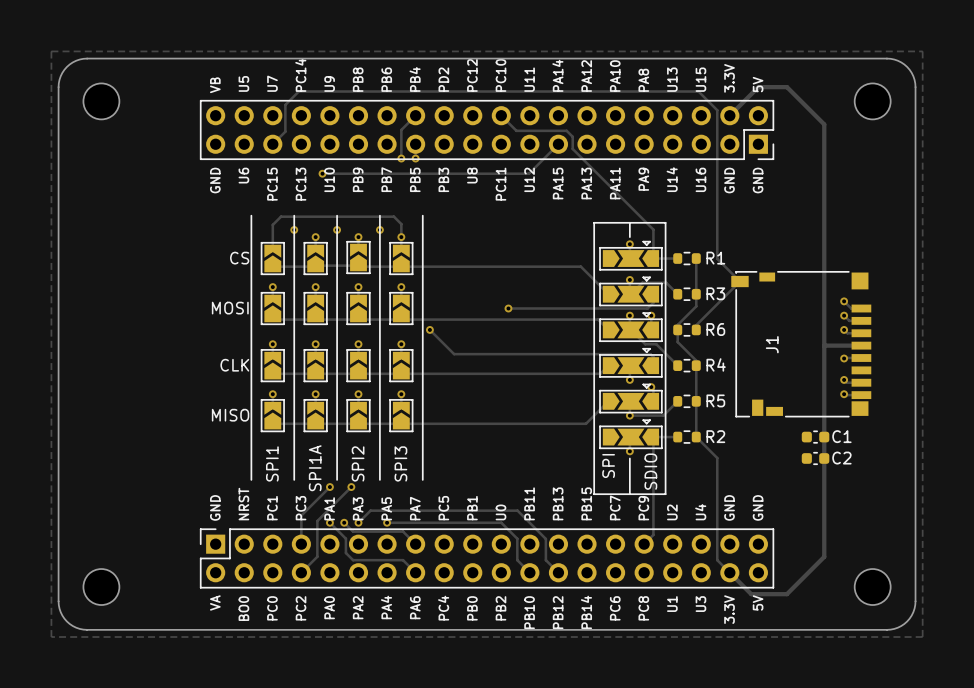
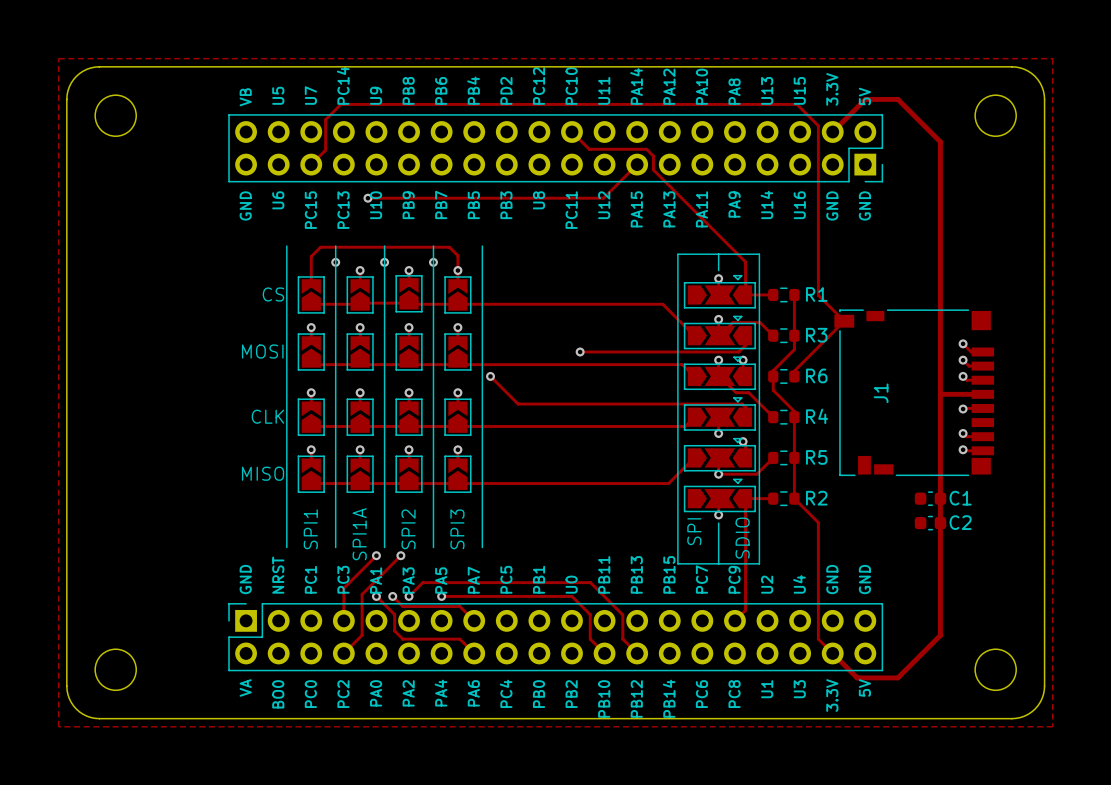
track: (415, 115) (401, 129) (401, 158) -> none
via: (401, 158) -> none
via: (415, 158) -> none

